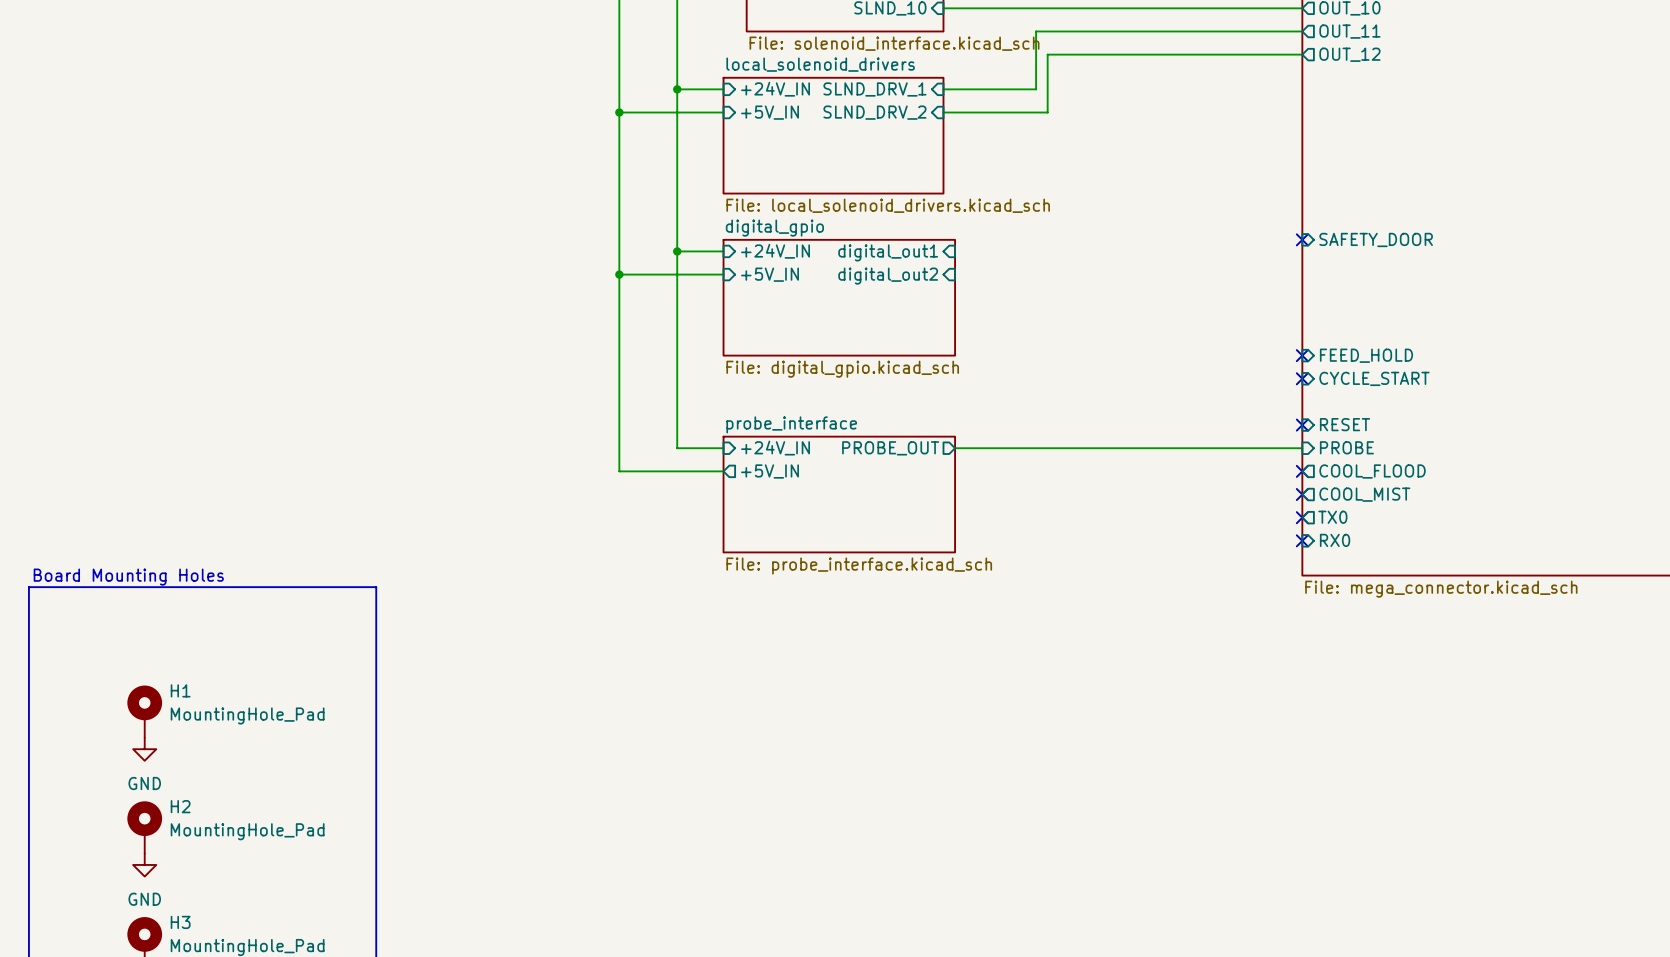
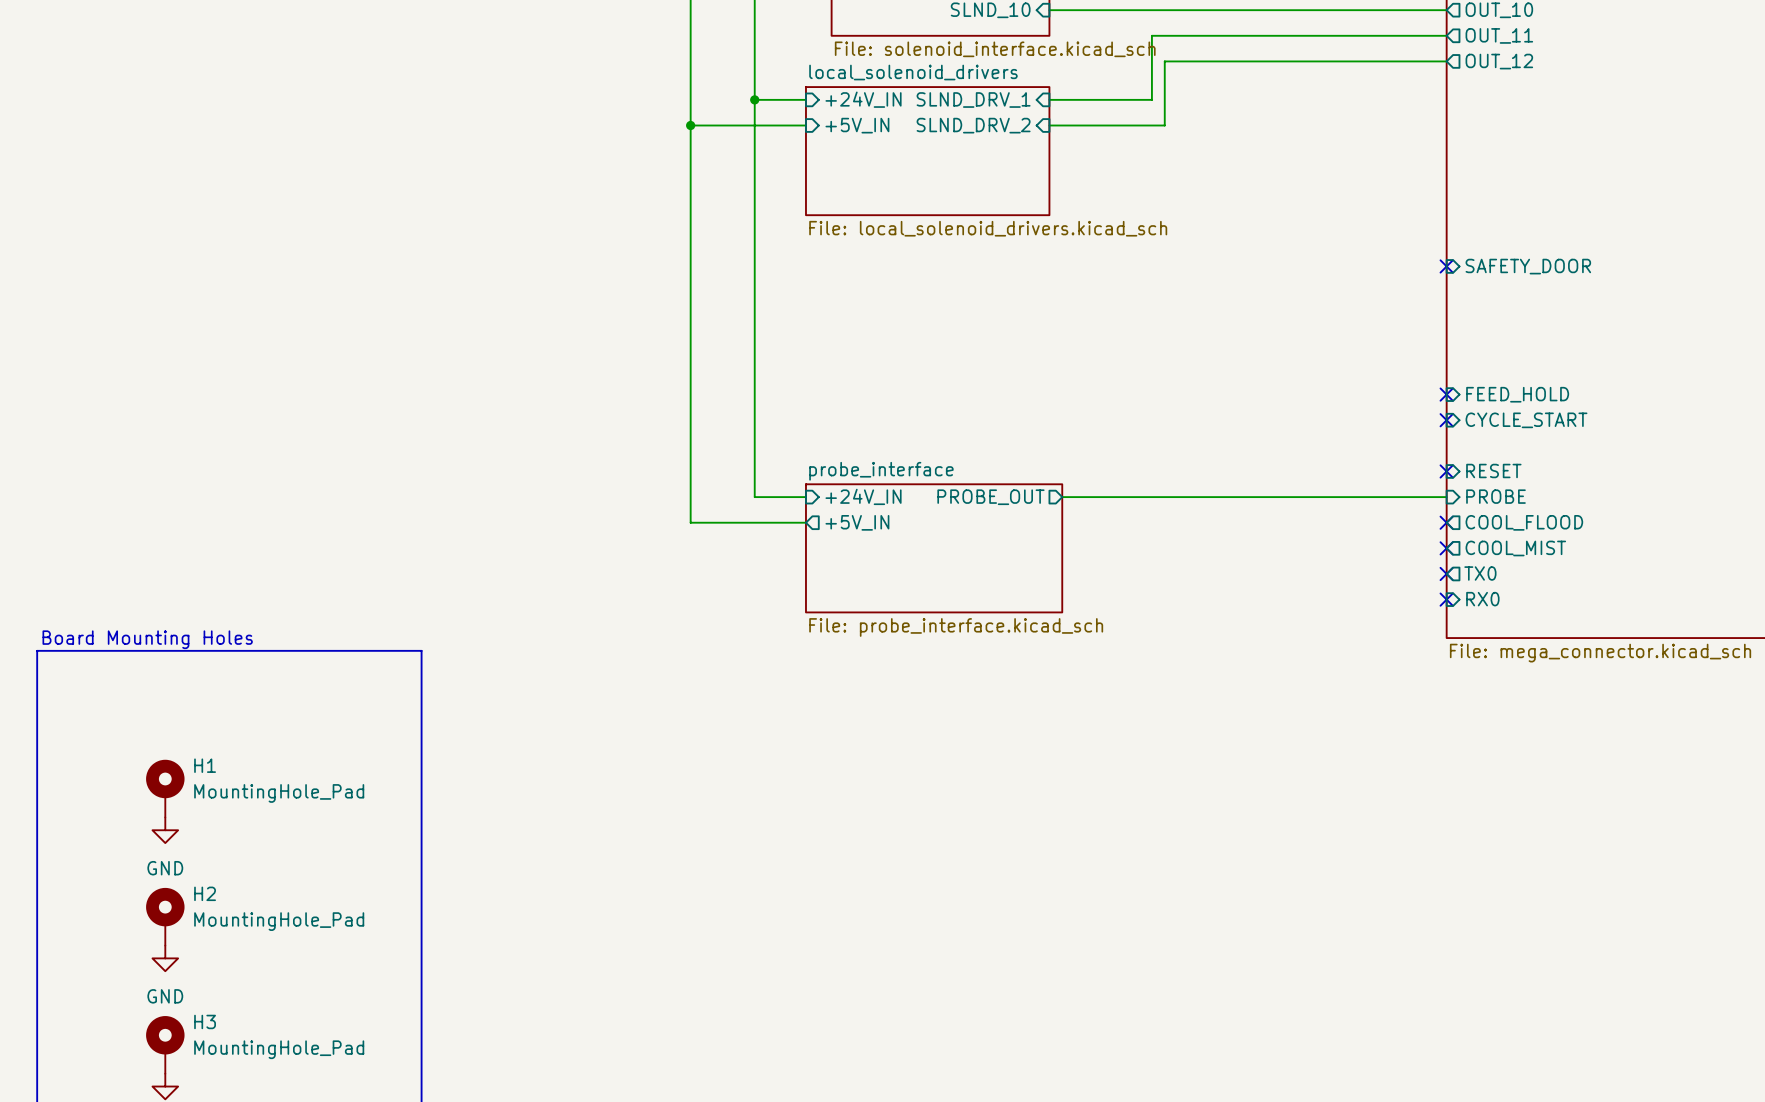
wire: (677, 251) (723, 251) -> none
junction: (677, 251) -> none
sheet pin: +24V_IN (775, 251) -> none
sheet pin: digital_out1 (888, 252) -> none
wire: (619, 274) (723, 274) -> none
junction: (619, 274) -> none
sheet pin: +5V_IN (770, 274) -> none
sheet pin: digital_out2 (888, 276) -> none
sheet digital_gpio: File: digital_gpio.kicad_sch (839, 297) -> none

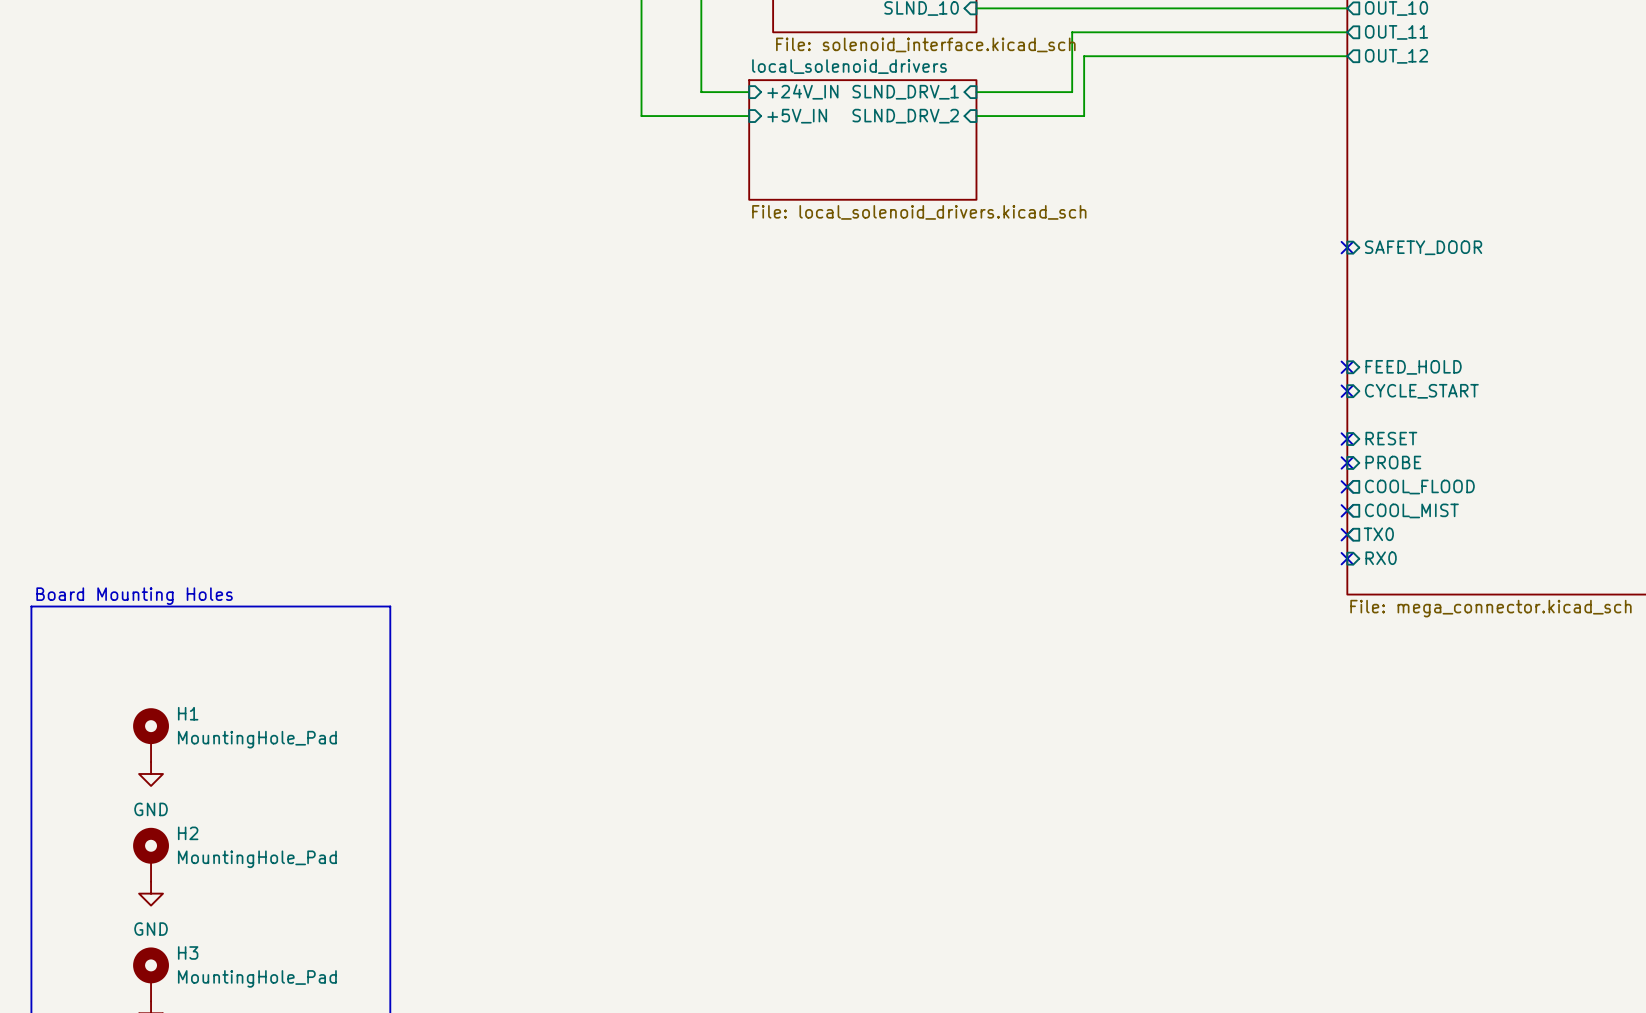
wire: (754, 99) (754, 497) (805, 497) -> none
junction: (754, 99) -> none
wire: (690, 125) (690, 522) (805, 522) -> none
junction: (690, 125) -> none
sheet pin: +24V_IN (863, 496) -> none
sheet pin: PROBE_OUT (990, 497) -> none
wire: (1062, 497) (1446, 497) -> none
no-connect mark: none -> (1347, 462)
sheet pin: +5V_IN (857, 522) -> none
sheet probe_interface: File: probe_interface.kicad_sch (934, 548) -> none

